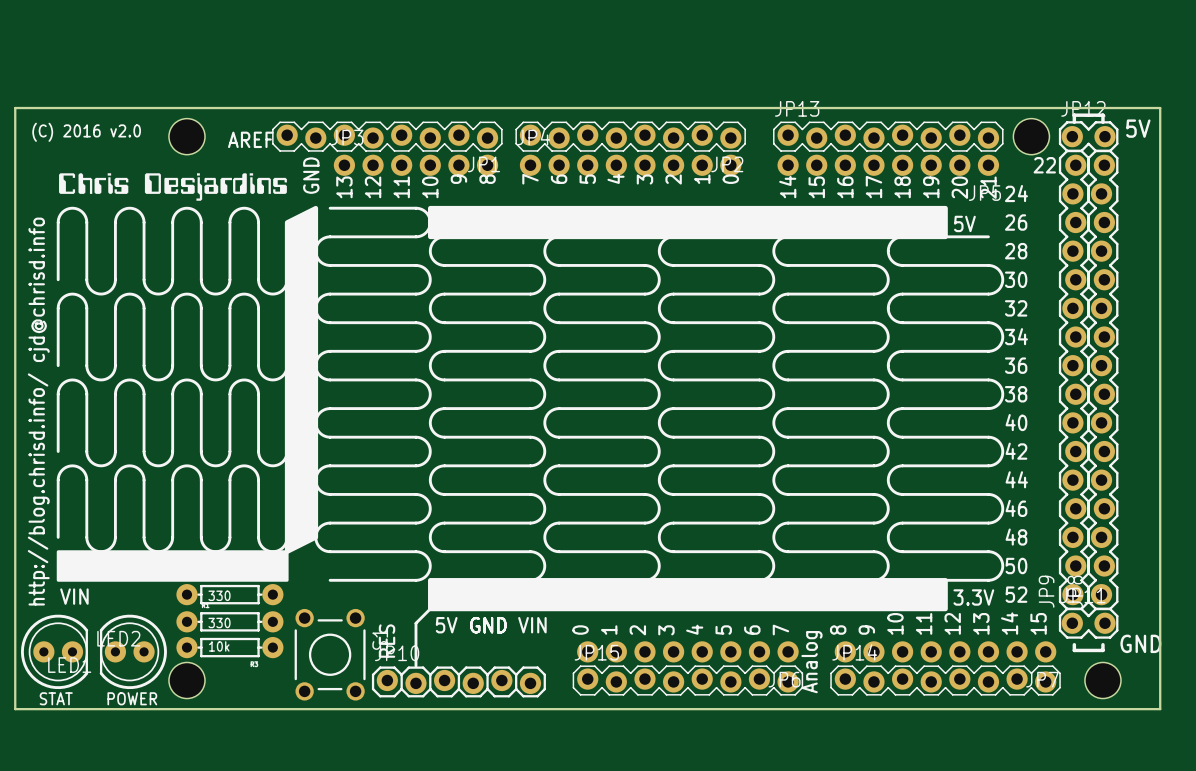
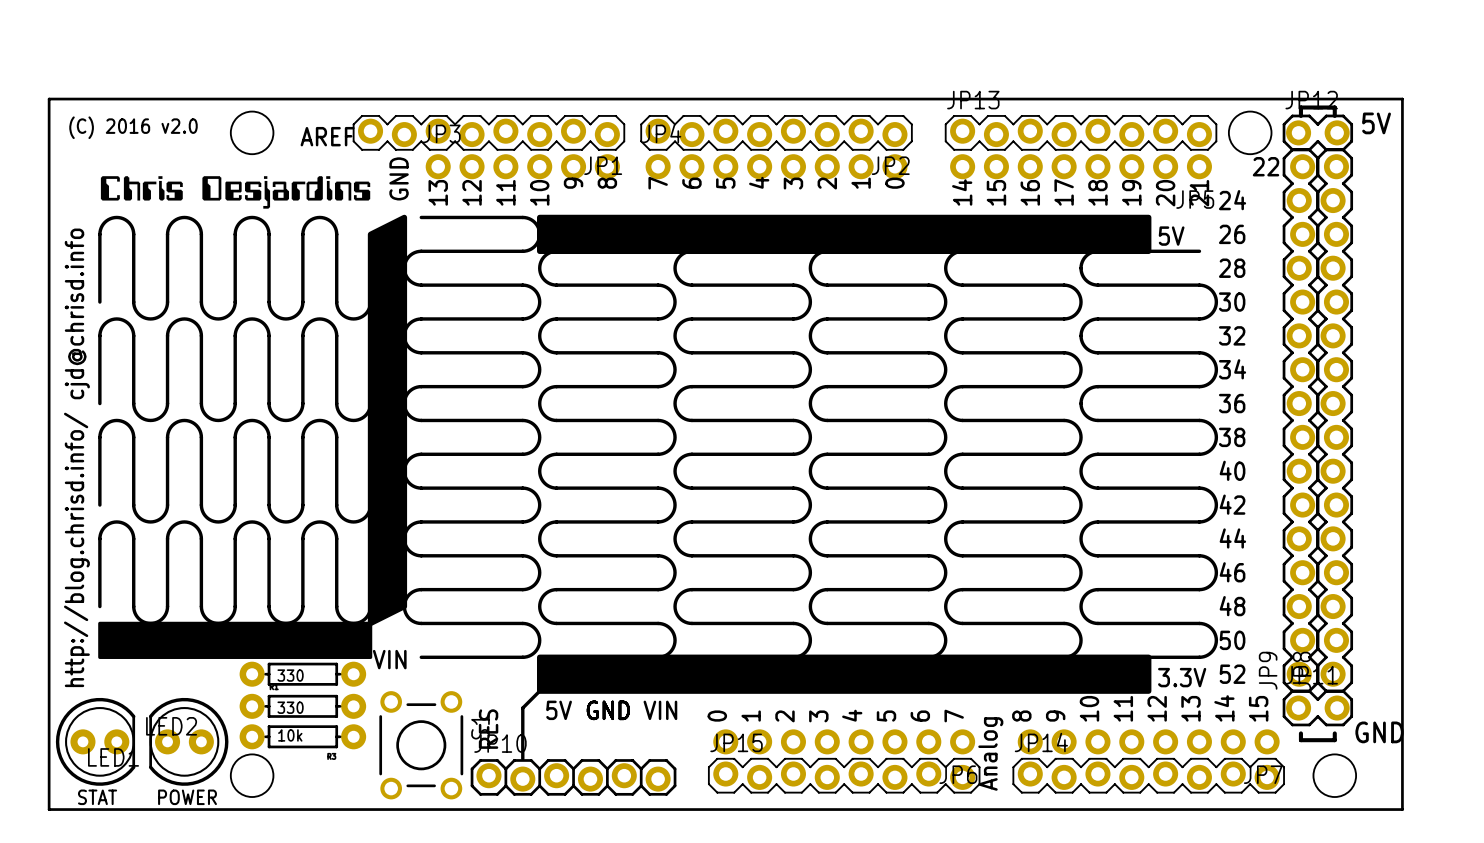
text position: VIN (74, 596) -> VIN (389, 659)

